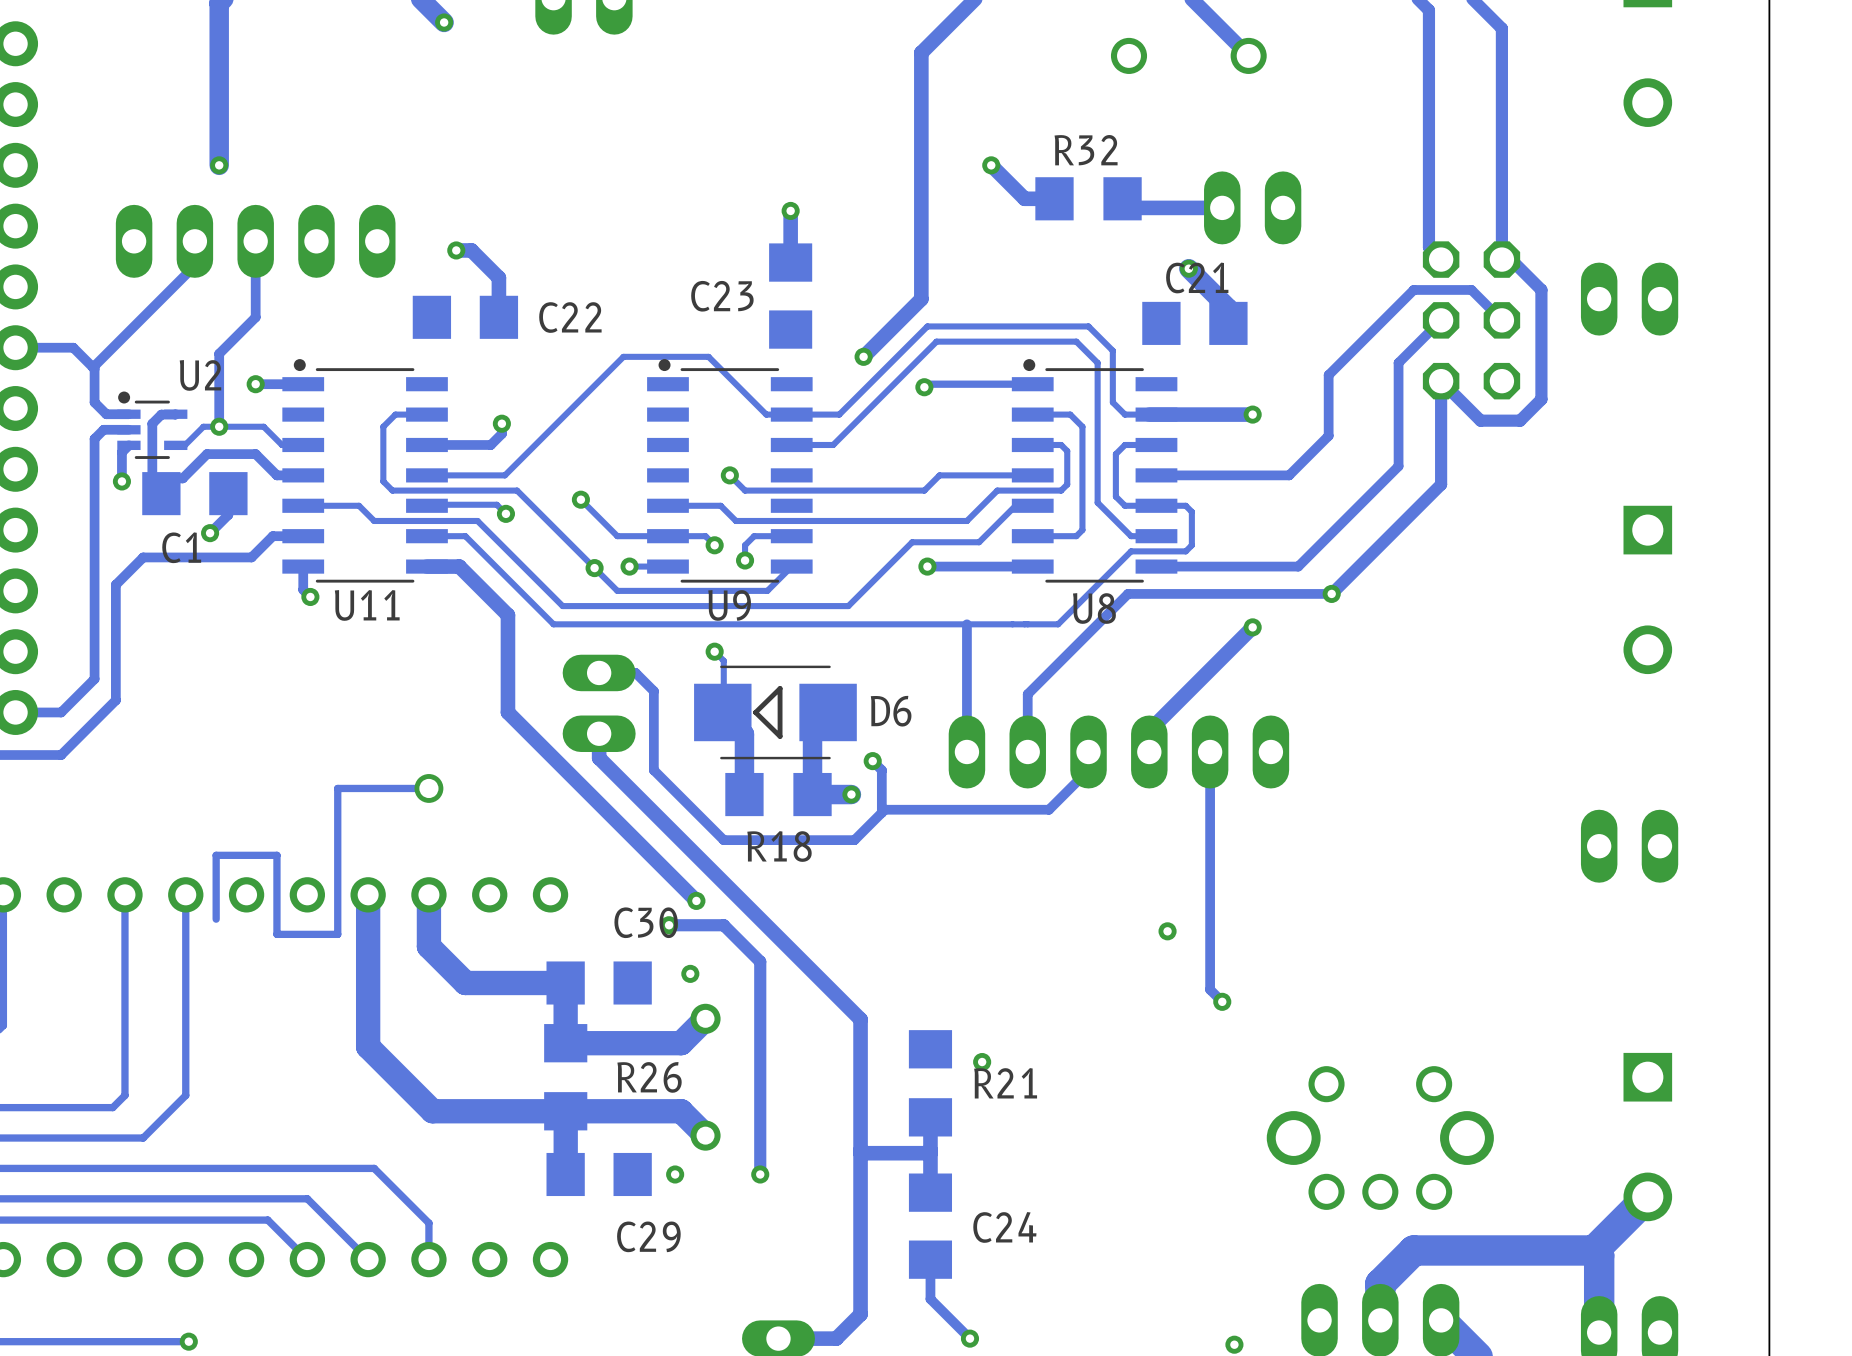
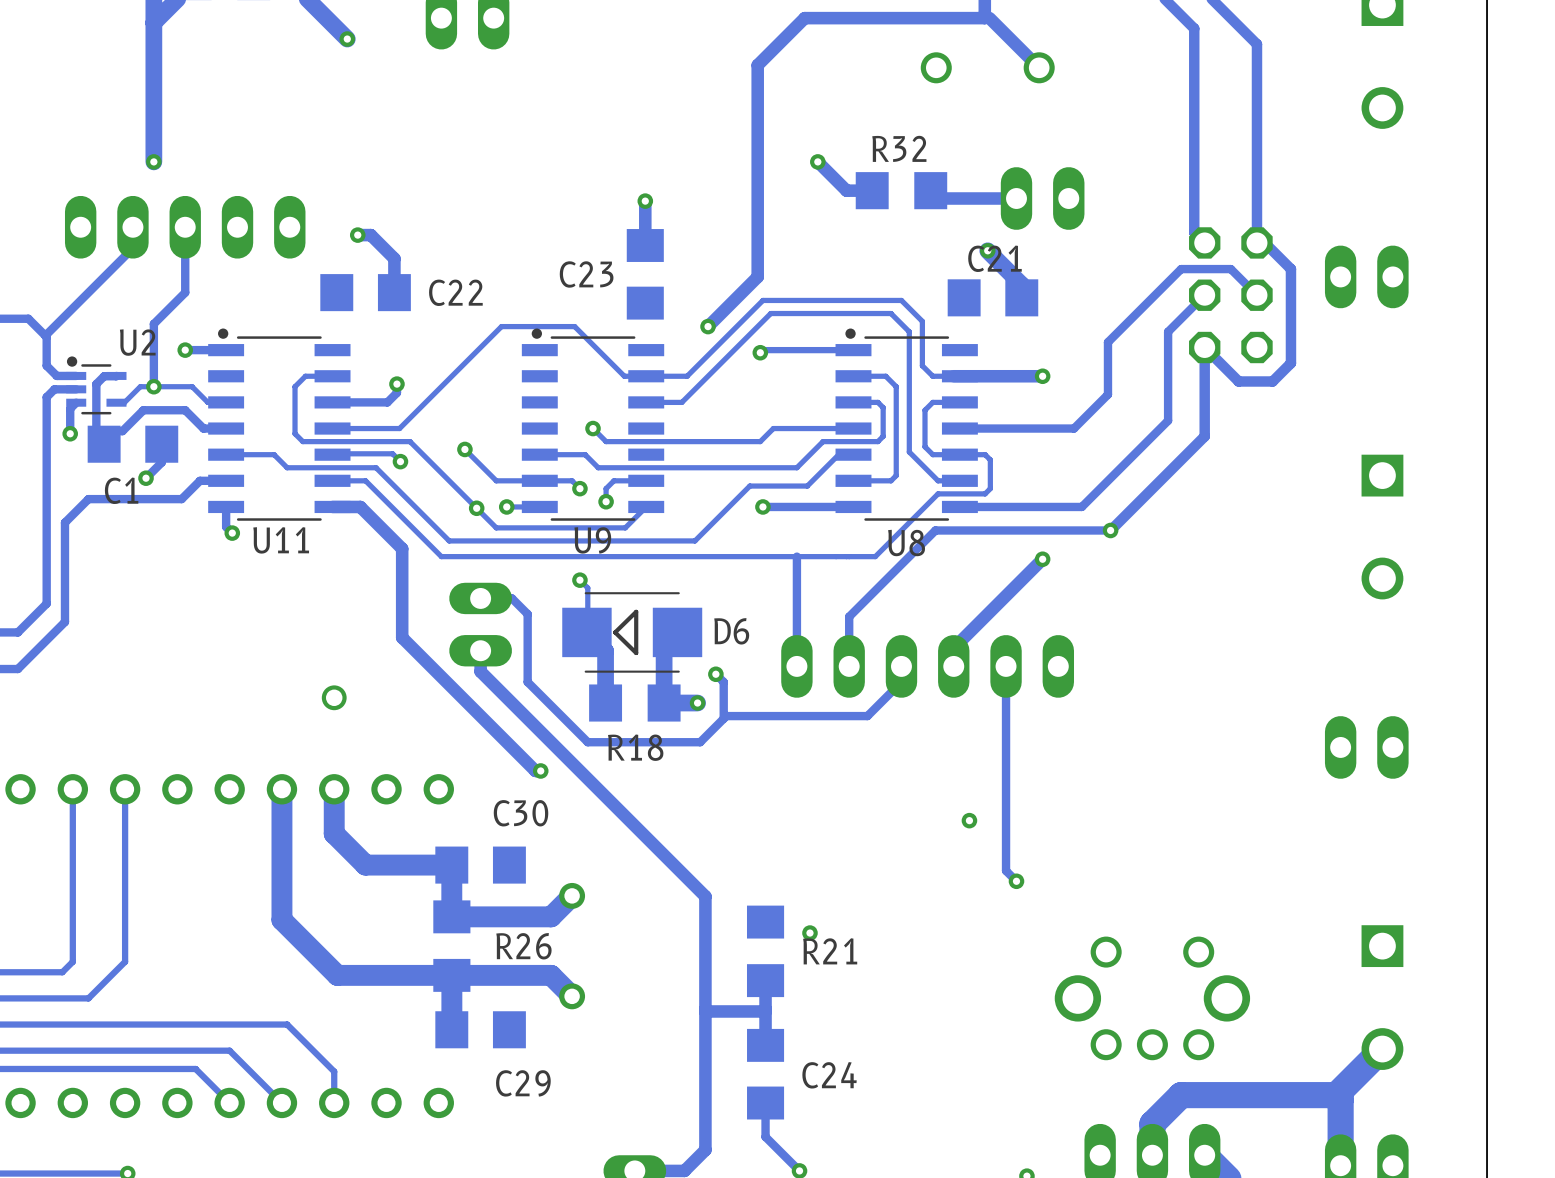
track: (507, 712) (696, 900) -> (402, 632) (402, 637) (535, 770) (540, 770)
track: (428, 788) (337, 788) (337, 934) (276, 934) (276, 855) (216, 855) (216, 919) -> none
via: none -> (540, 770)
via: (696, 900) -> none
track: (669, 925) (723, 925) (760, 961) (760, 1174) -> none
via: (669, 925) -> none
via: (690, 973) -> none
via: (675, 1174) -> none
via: (760, 1174) -> none

